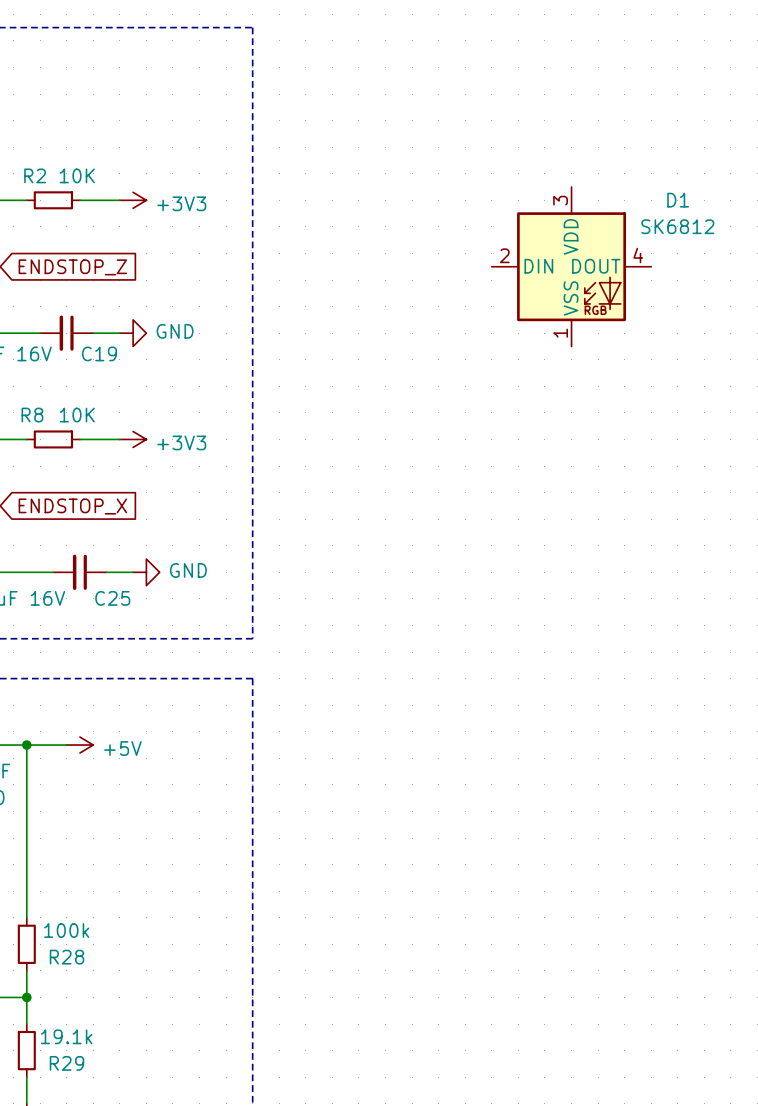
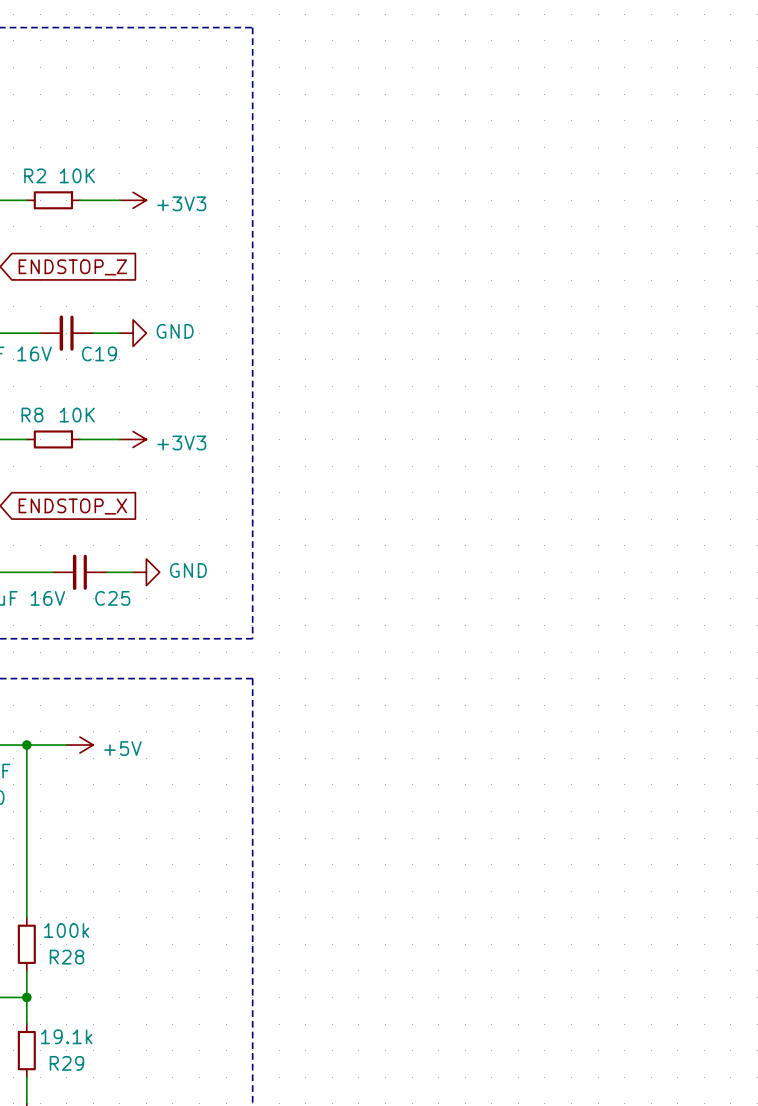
D1: SK6812 (571, 266) -> none

